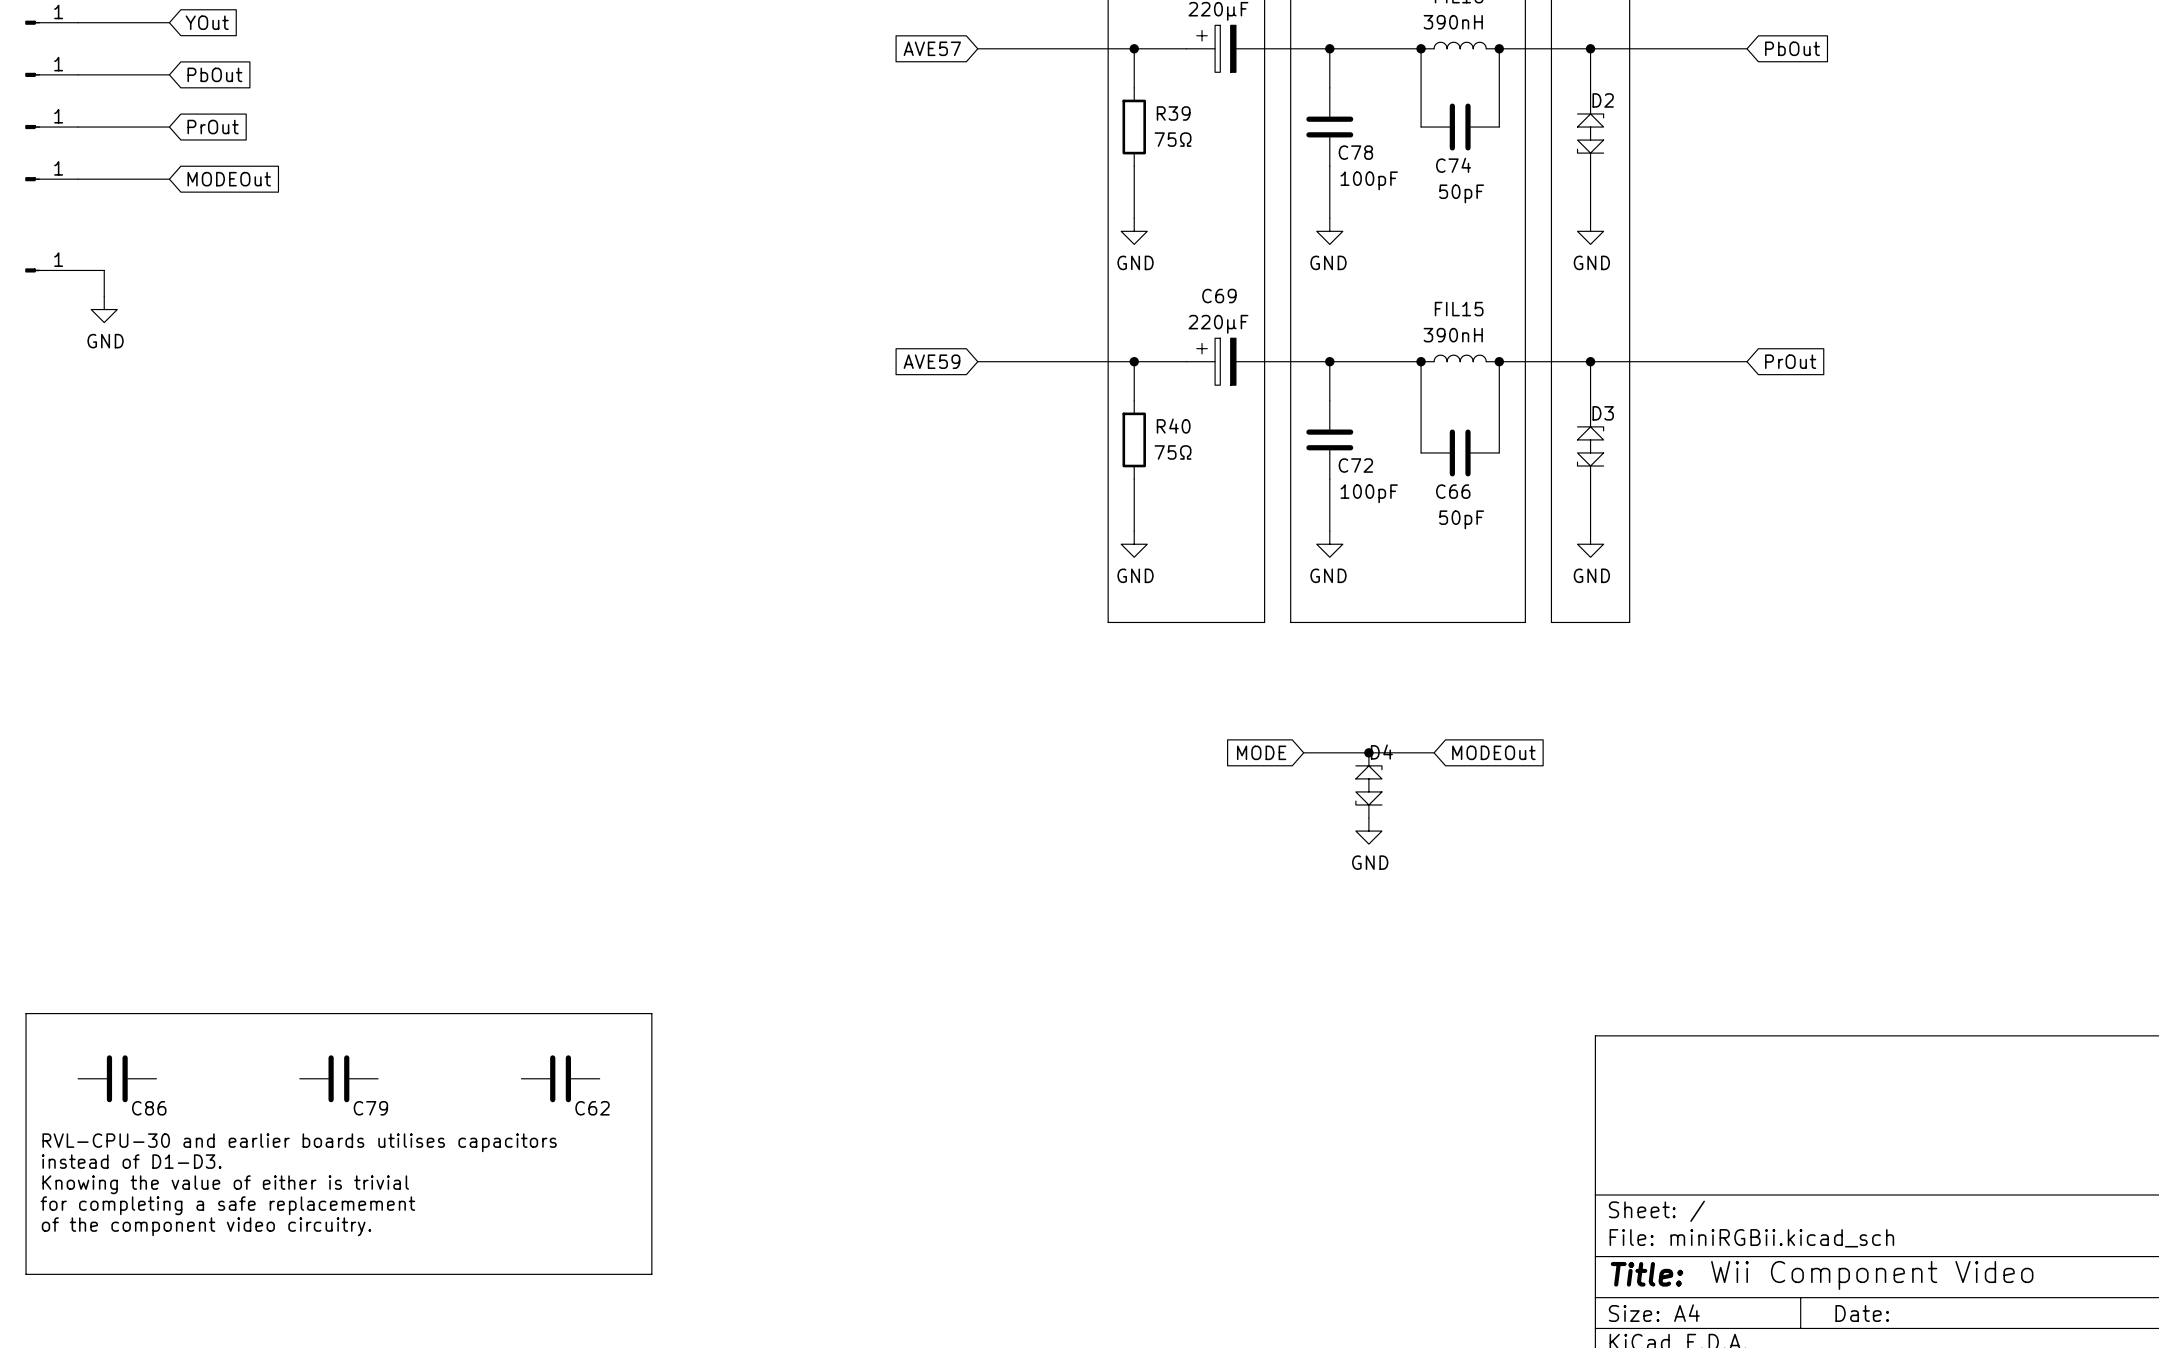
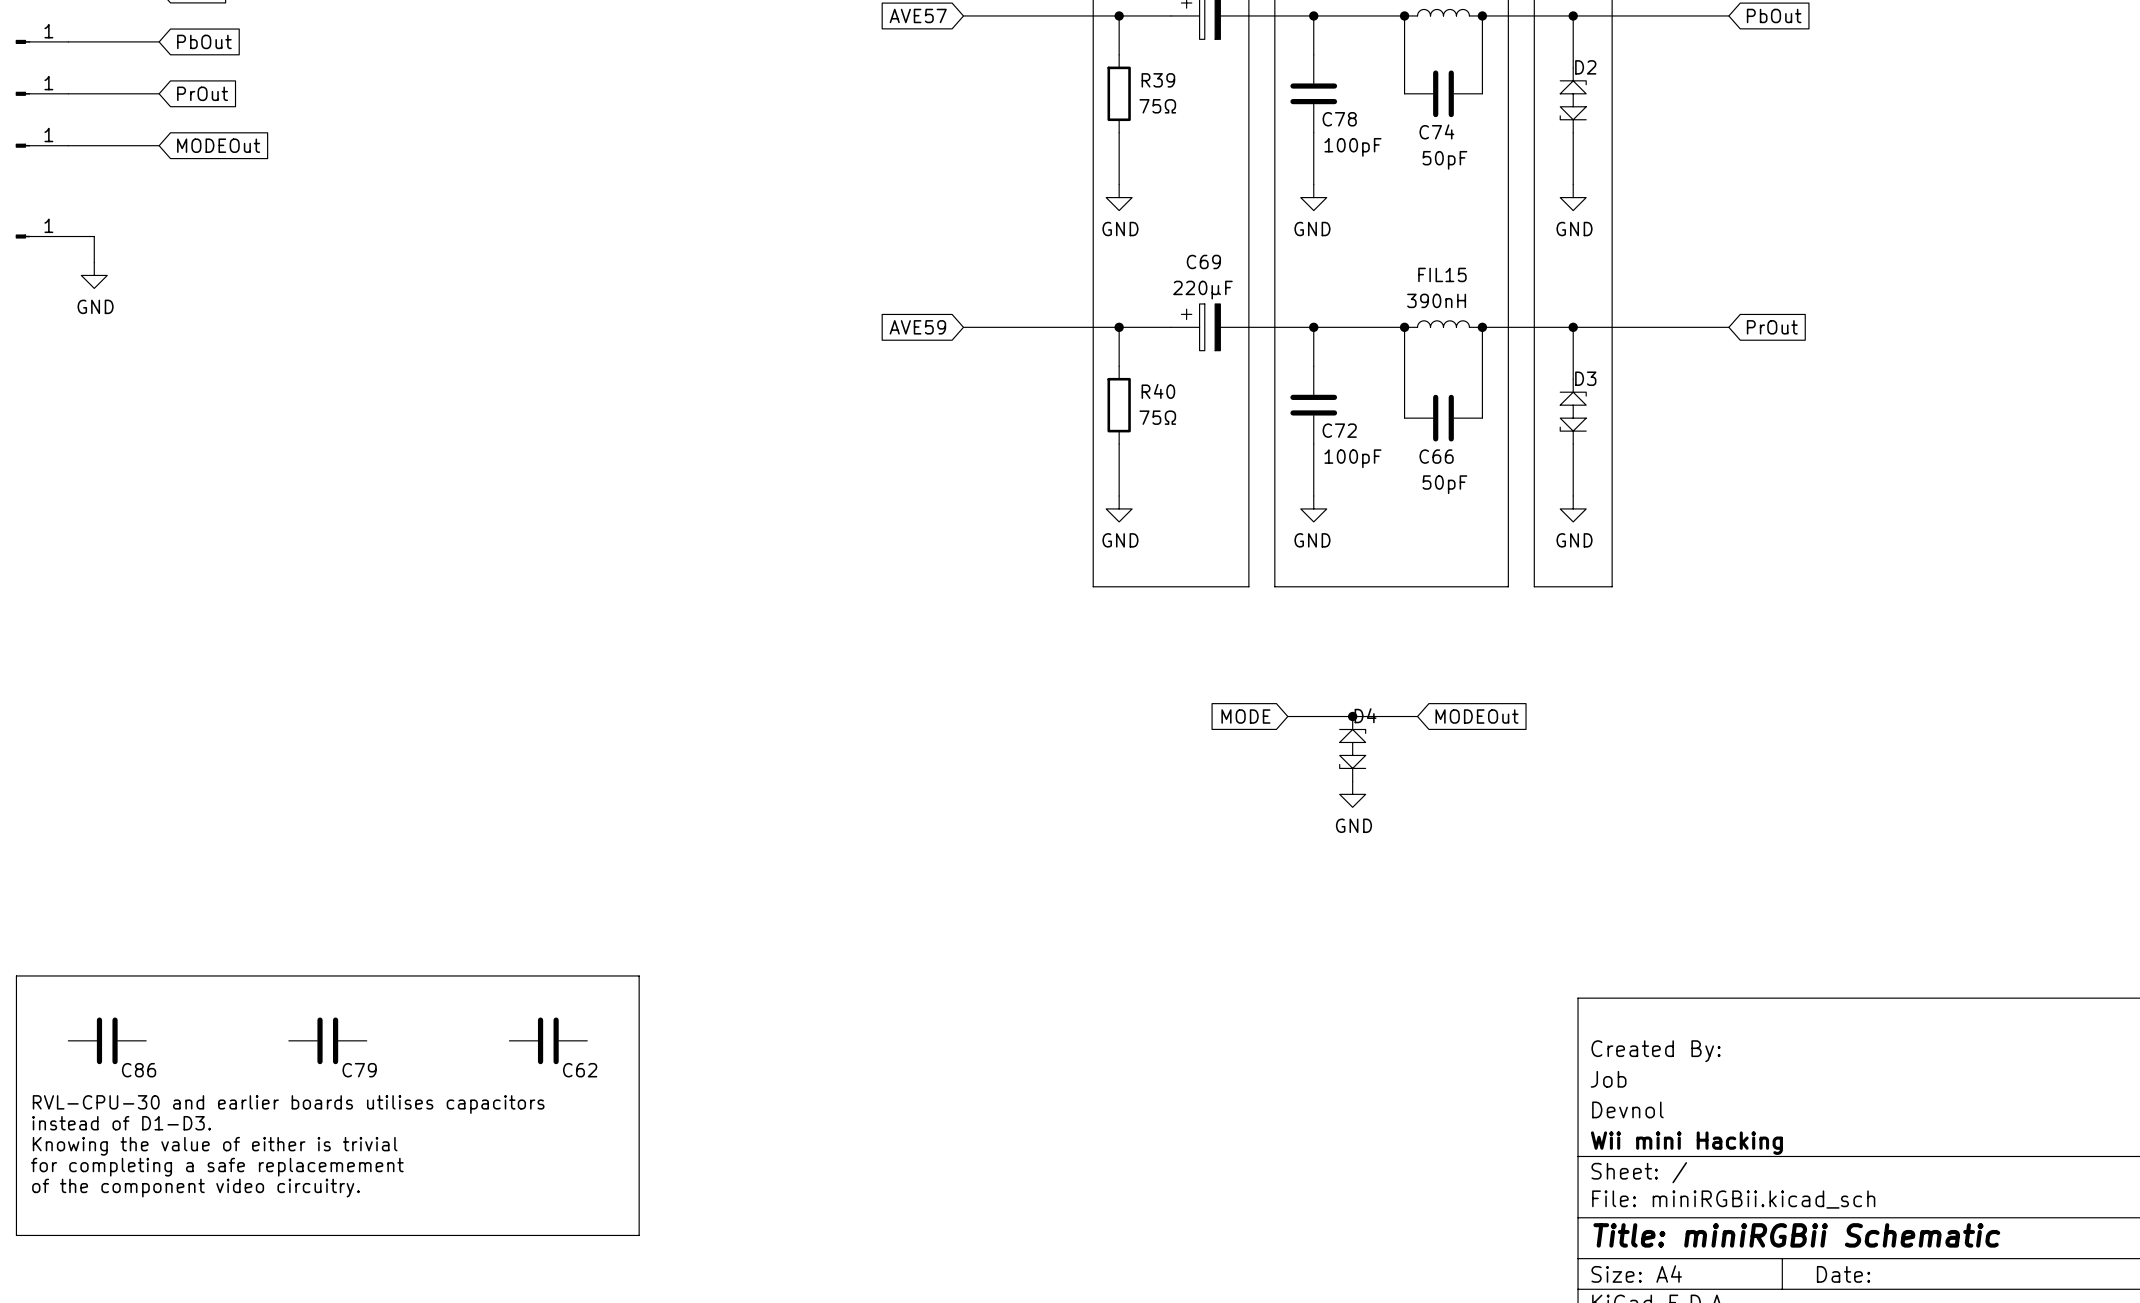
title block: none -> Created By: (1656, 1051)
title block: none -> Job (1608, 1079)
title block: none -> Devnol (1627, 1109)
title block: none -> Wii mini Hacking (1686, 1143)
title block: Title: (1647, 1274) -> Title: miniRGBii Schematic (1796, 1235)
text: Wii Component Video (1872, 1275) -> none

